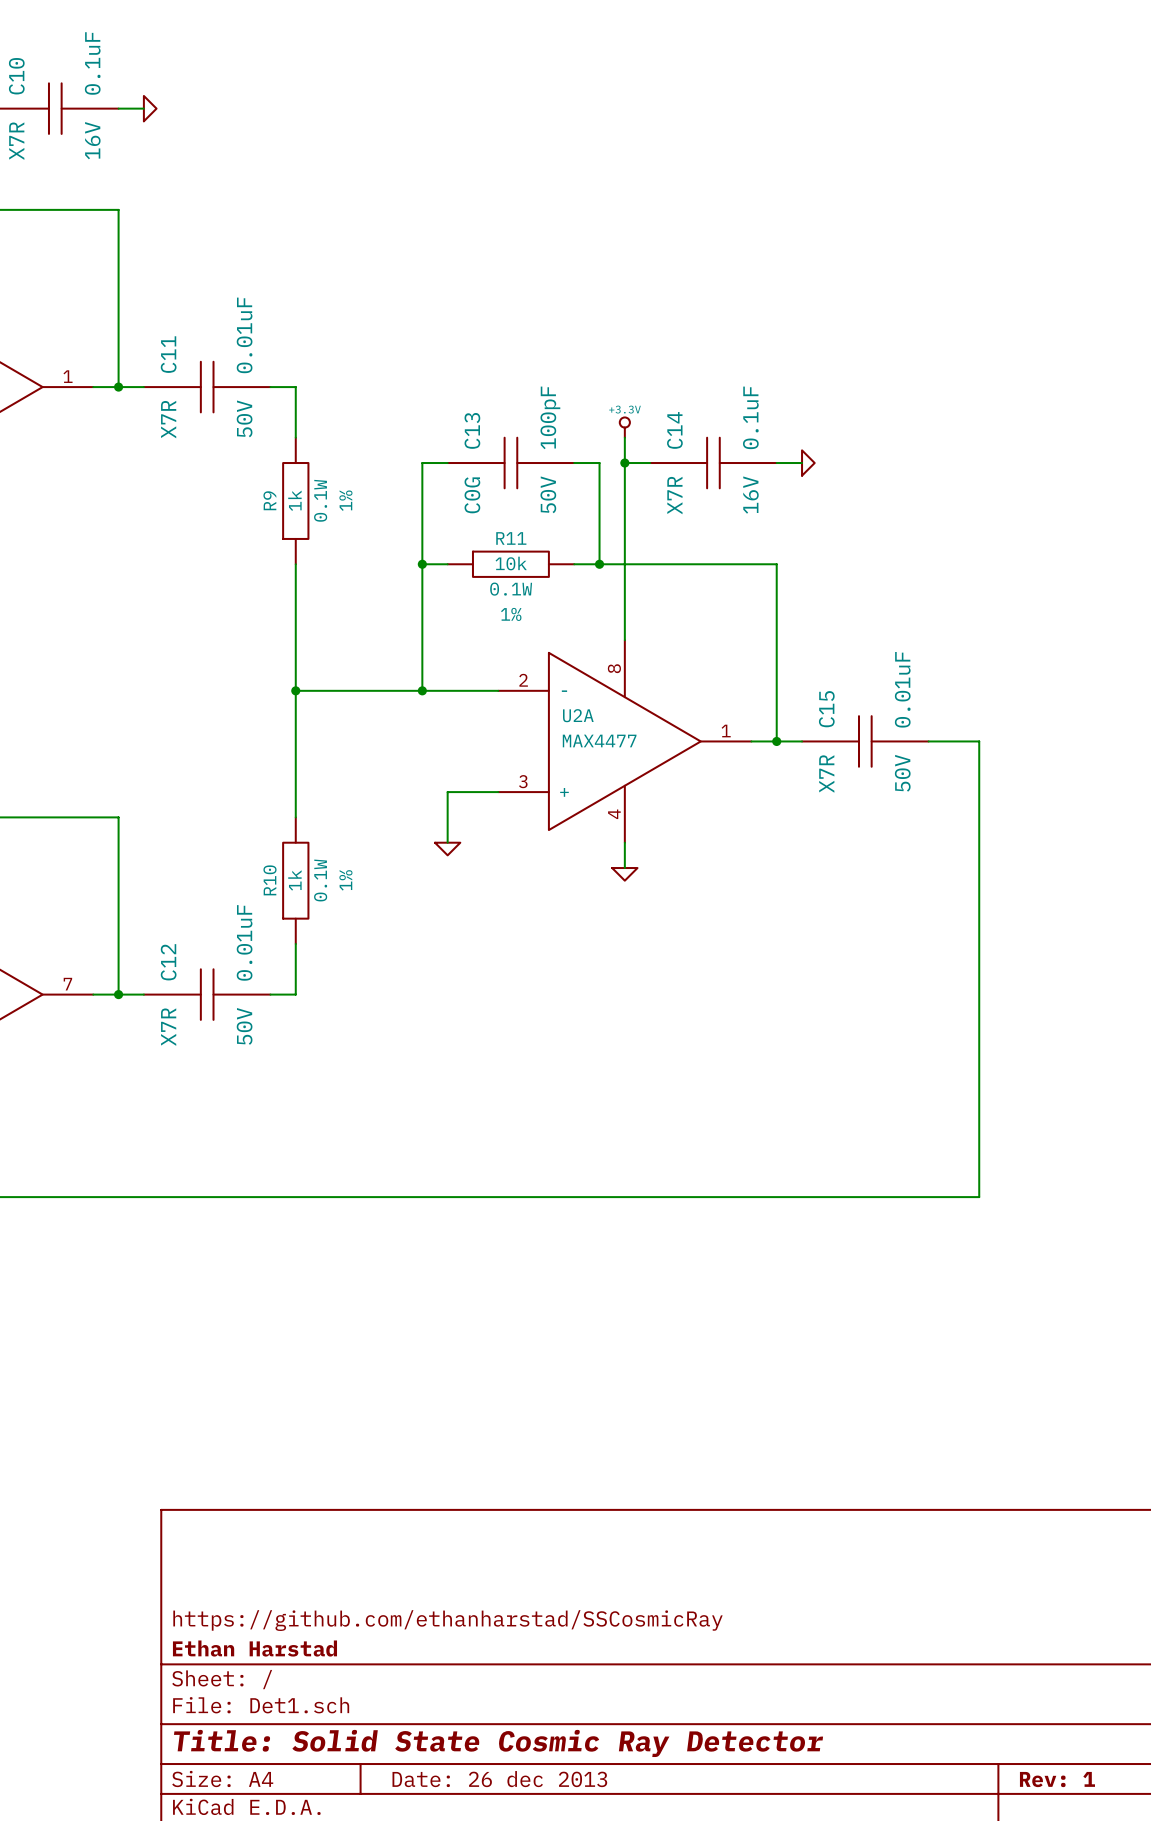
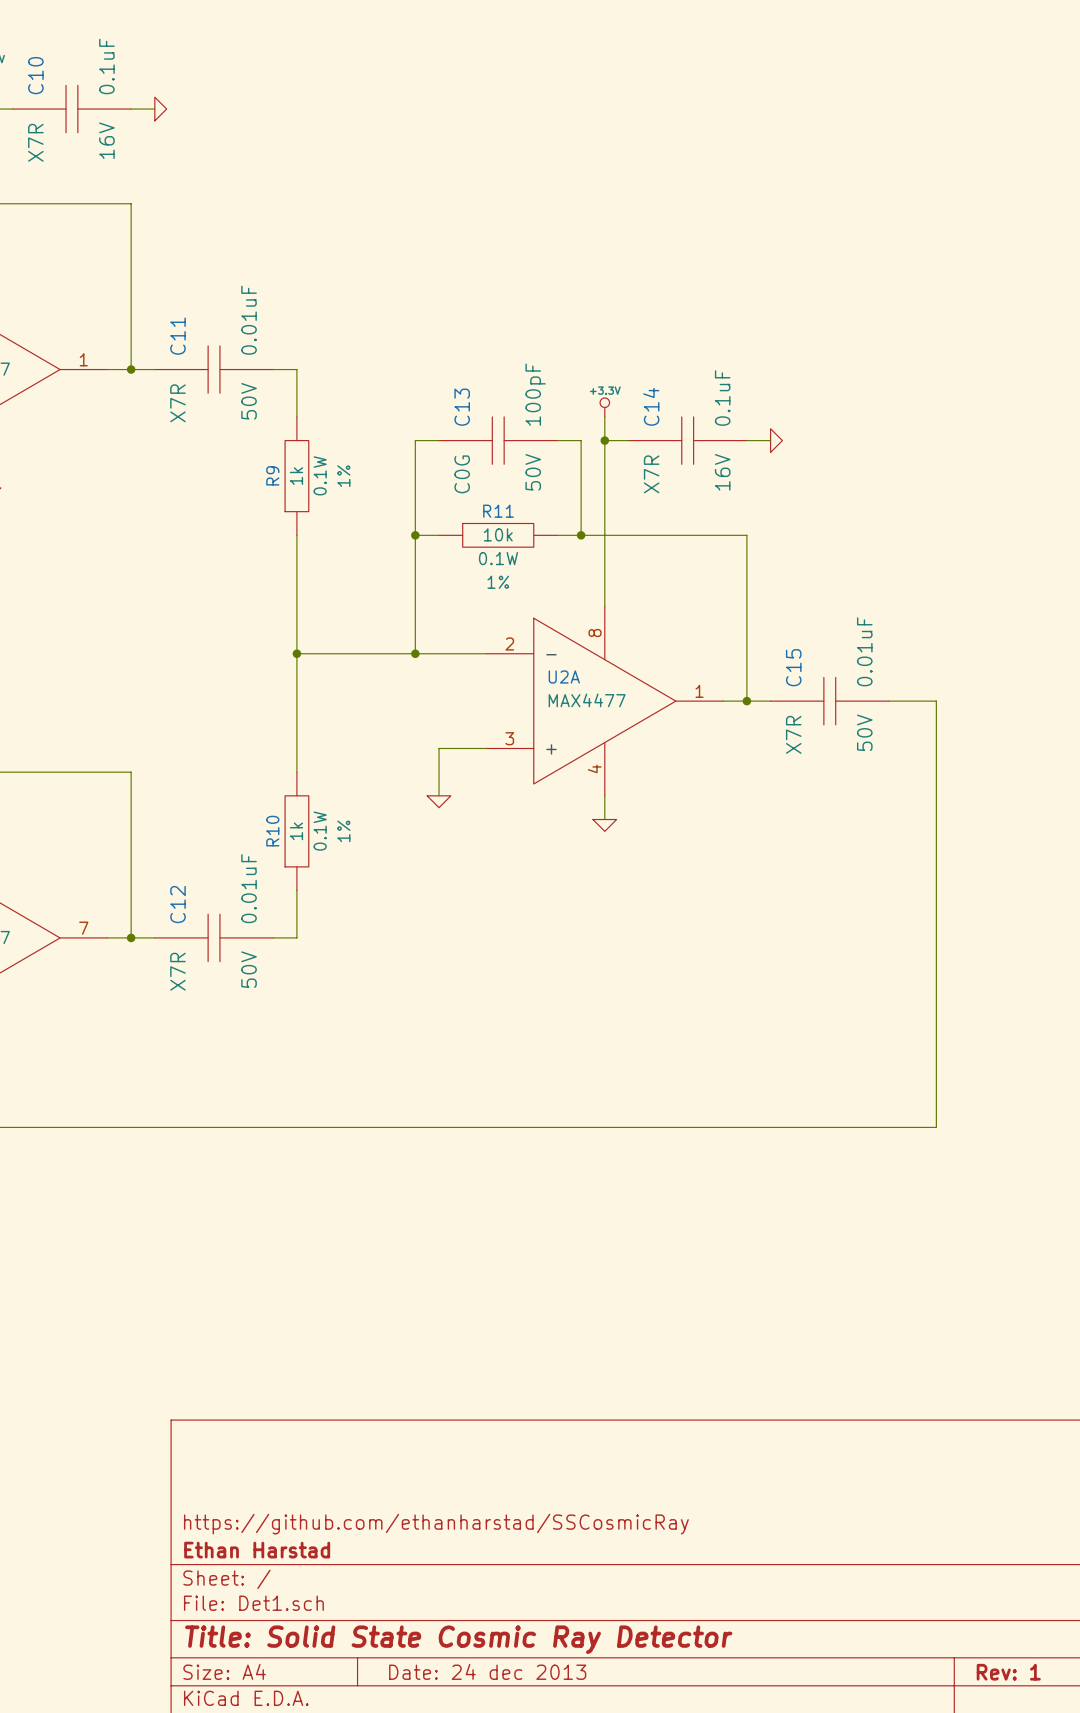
title block: Date: 26 dec 2013 (499, 1779) -> Date: 24 dec 2013 (487, 1671)

